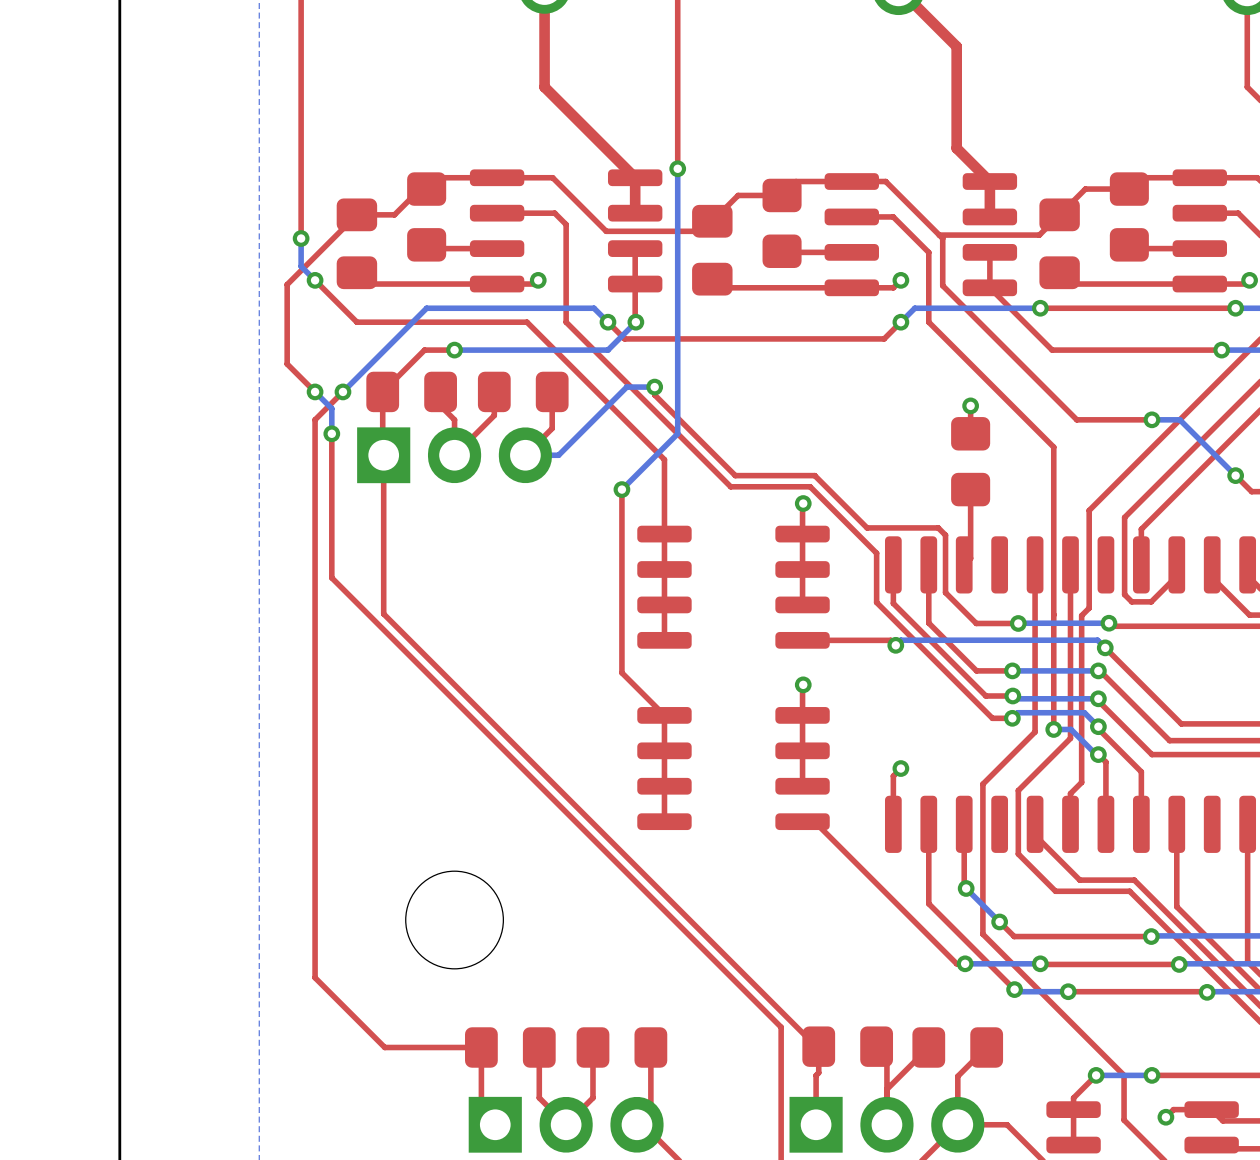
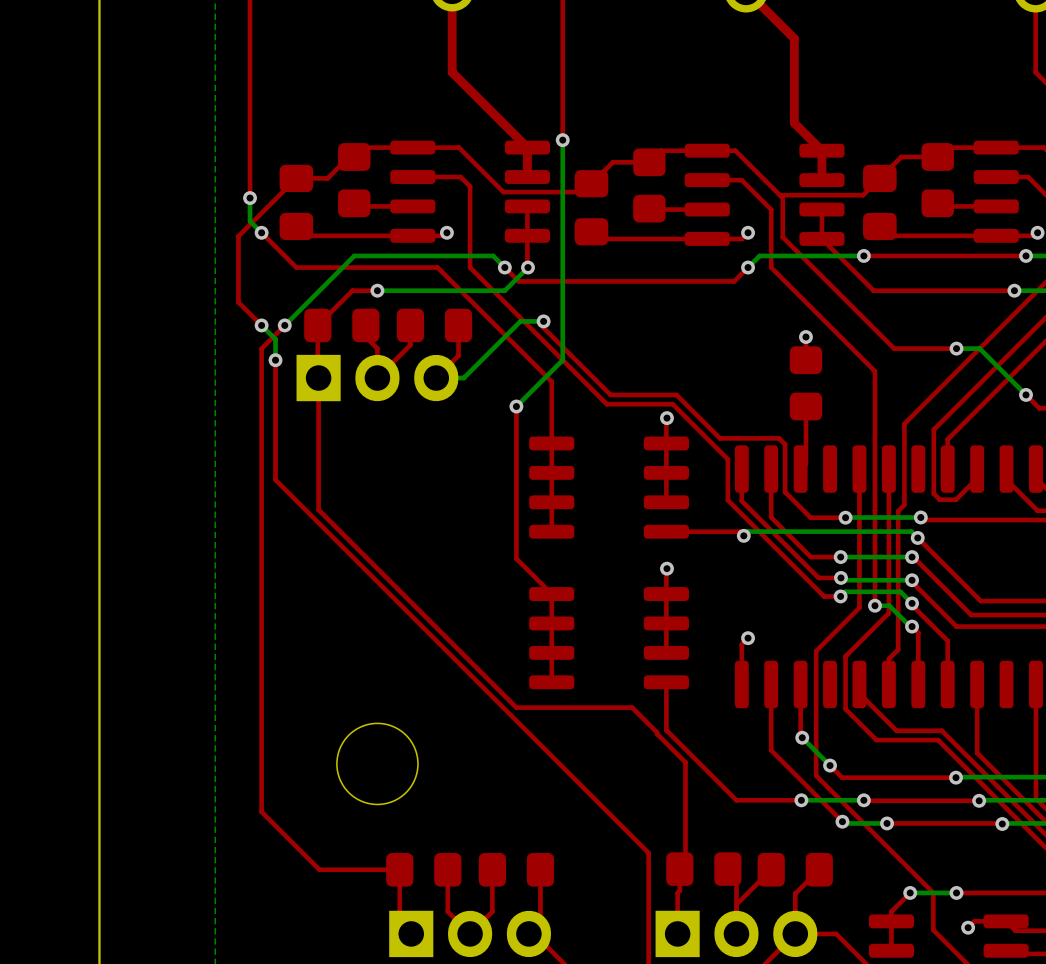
top track: (802, 821) (814, 821) (956, 963) -> (666, 682) (666, 730) (736, 800) (794, 800)
top track: (621, 852) (816, 1046) (818, 1046) -> (516, 707) (632, 707) (685, 762) (685, 868) (679, 869)

